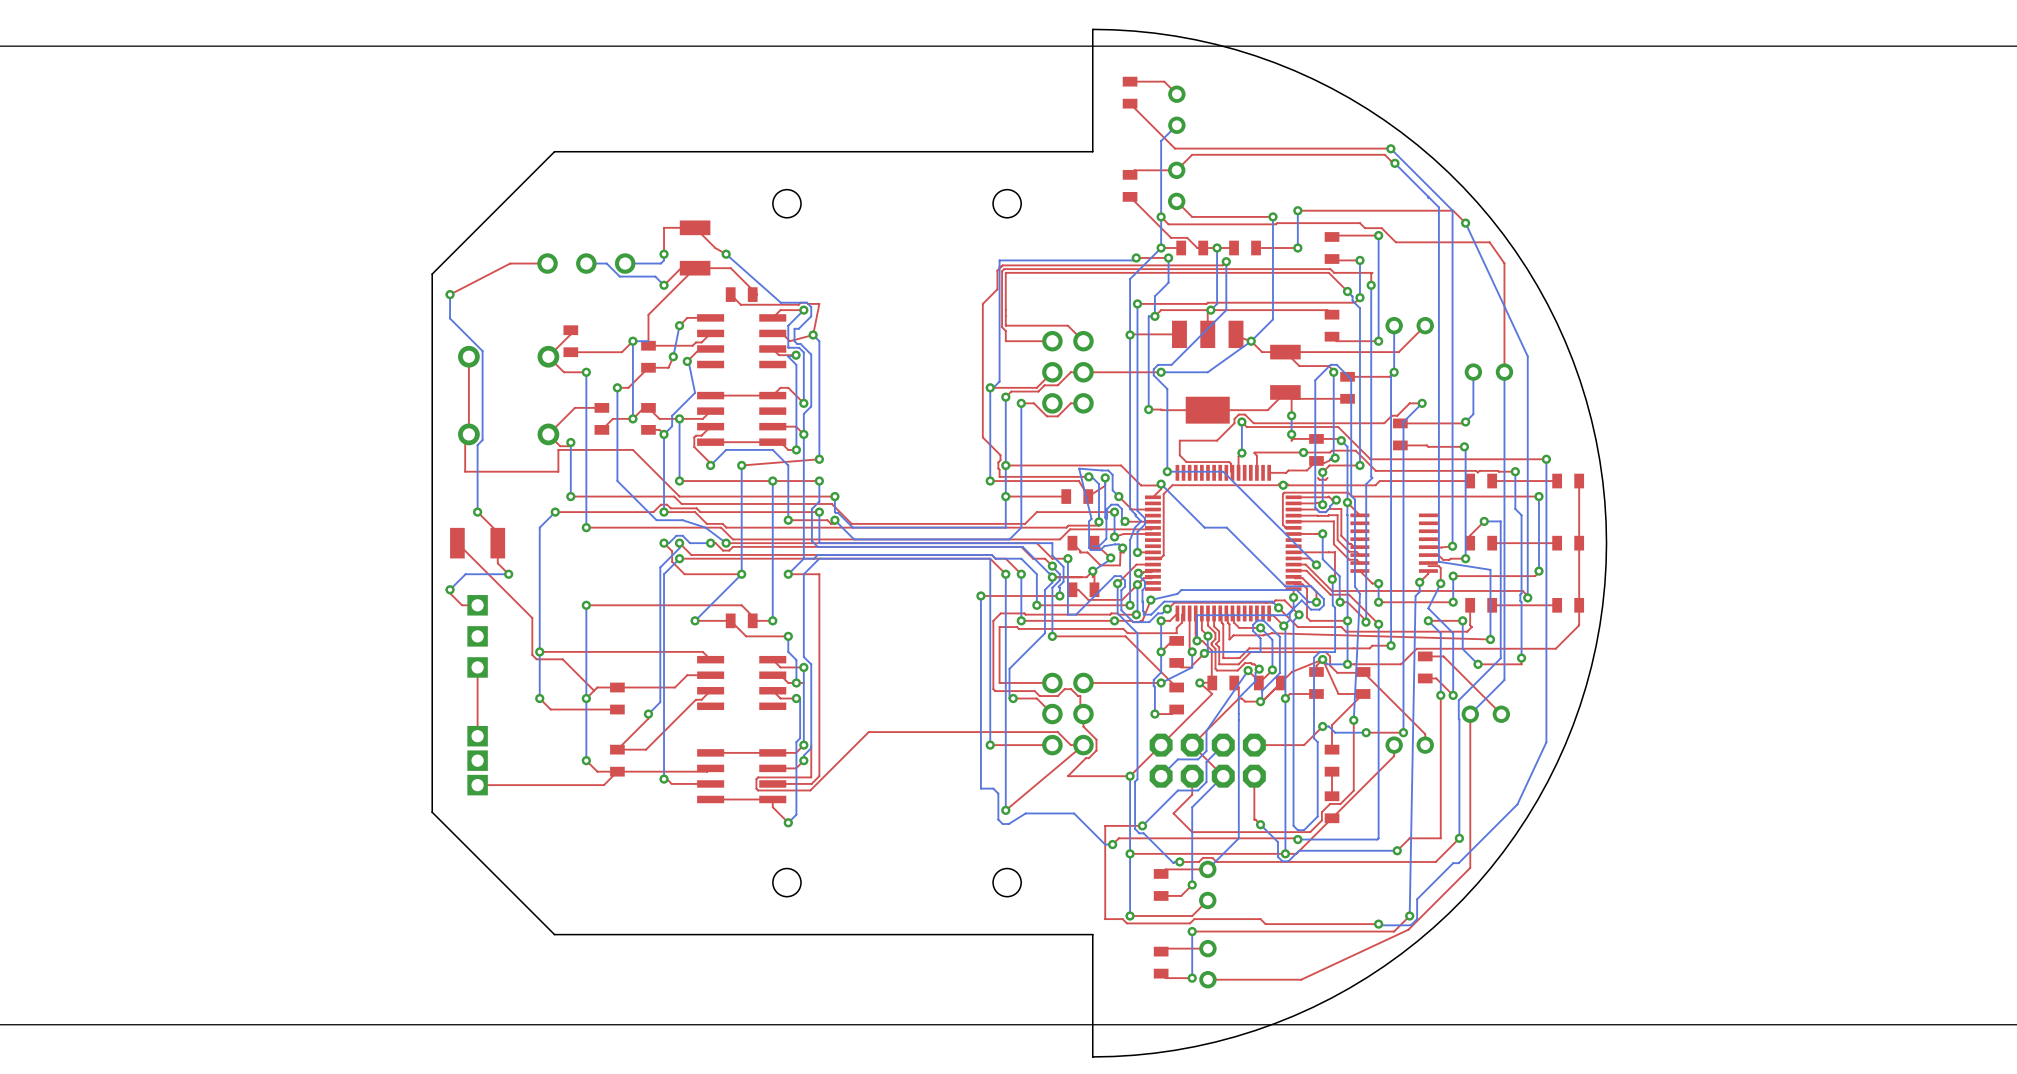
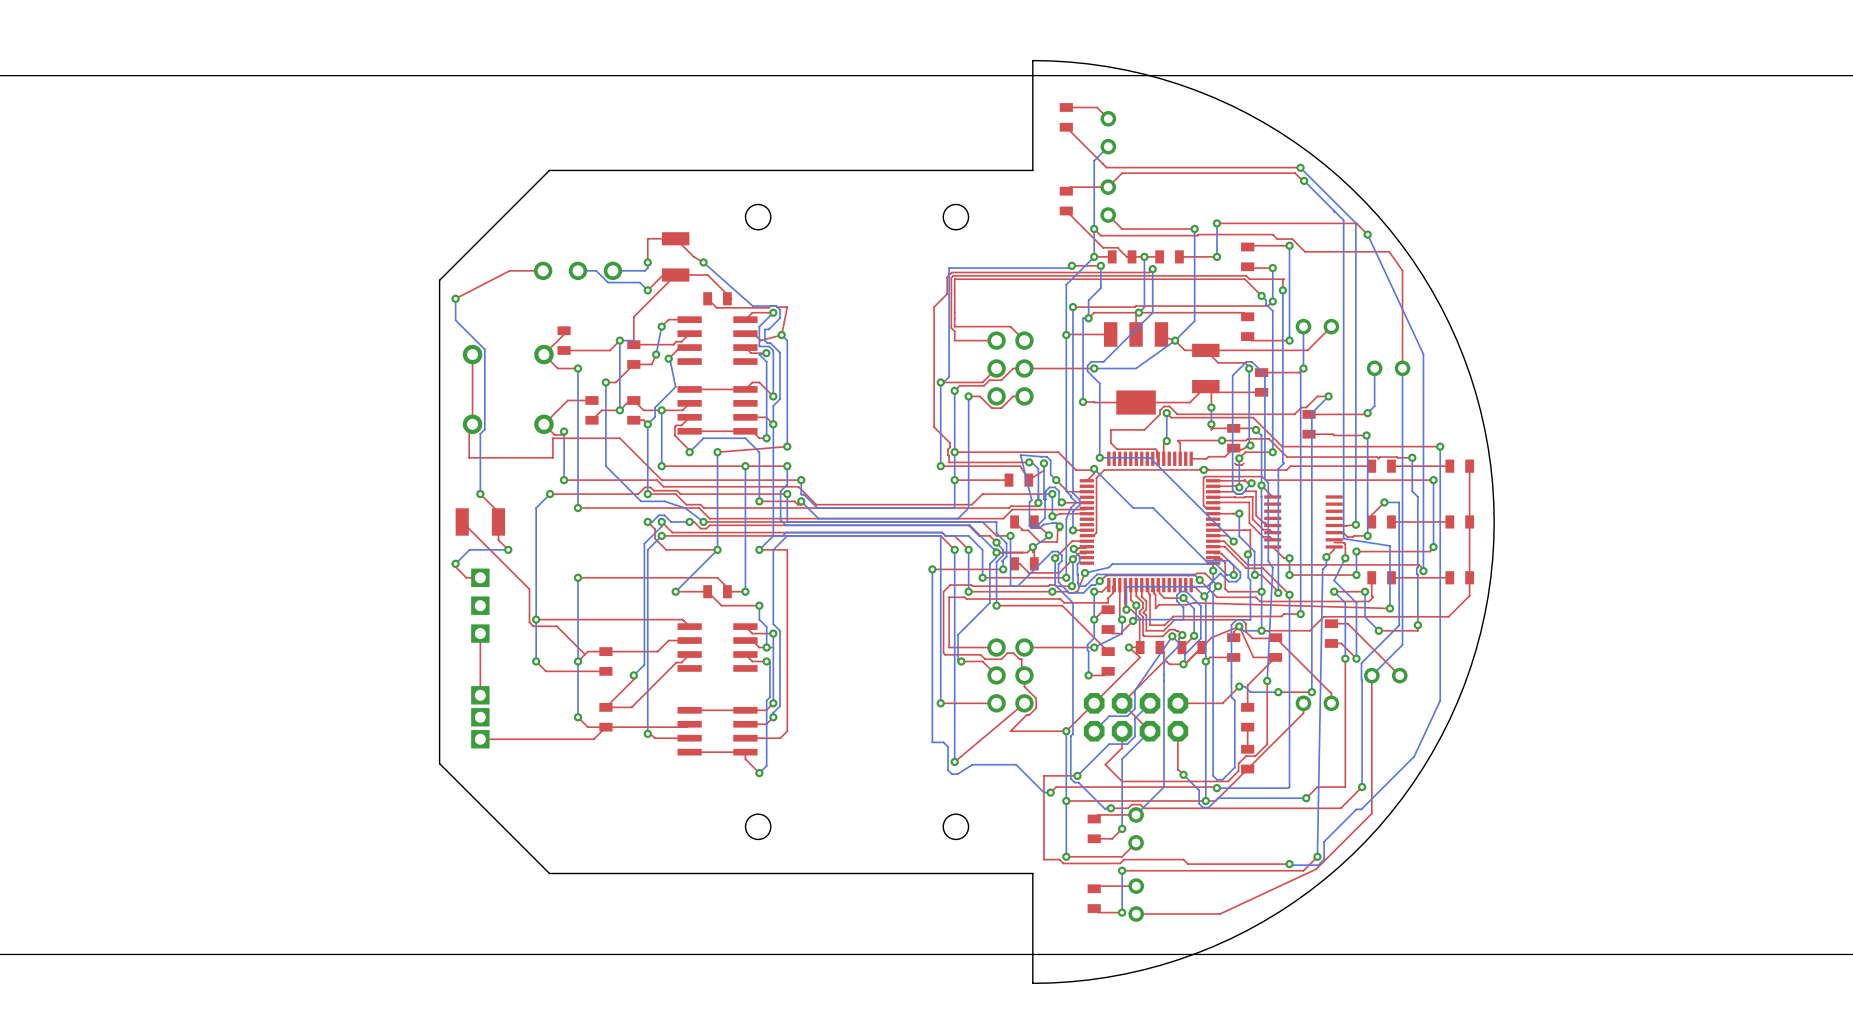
top track: (1083, 745) (1070, 745) (1057, 732) (868, 732) (810, 790) (758, 790) (756, 788) (758, 777) (811, 777) (811, 745) -> none

